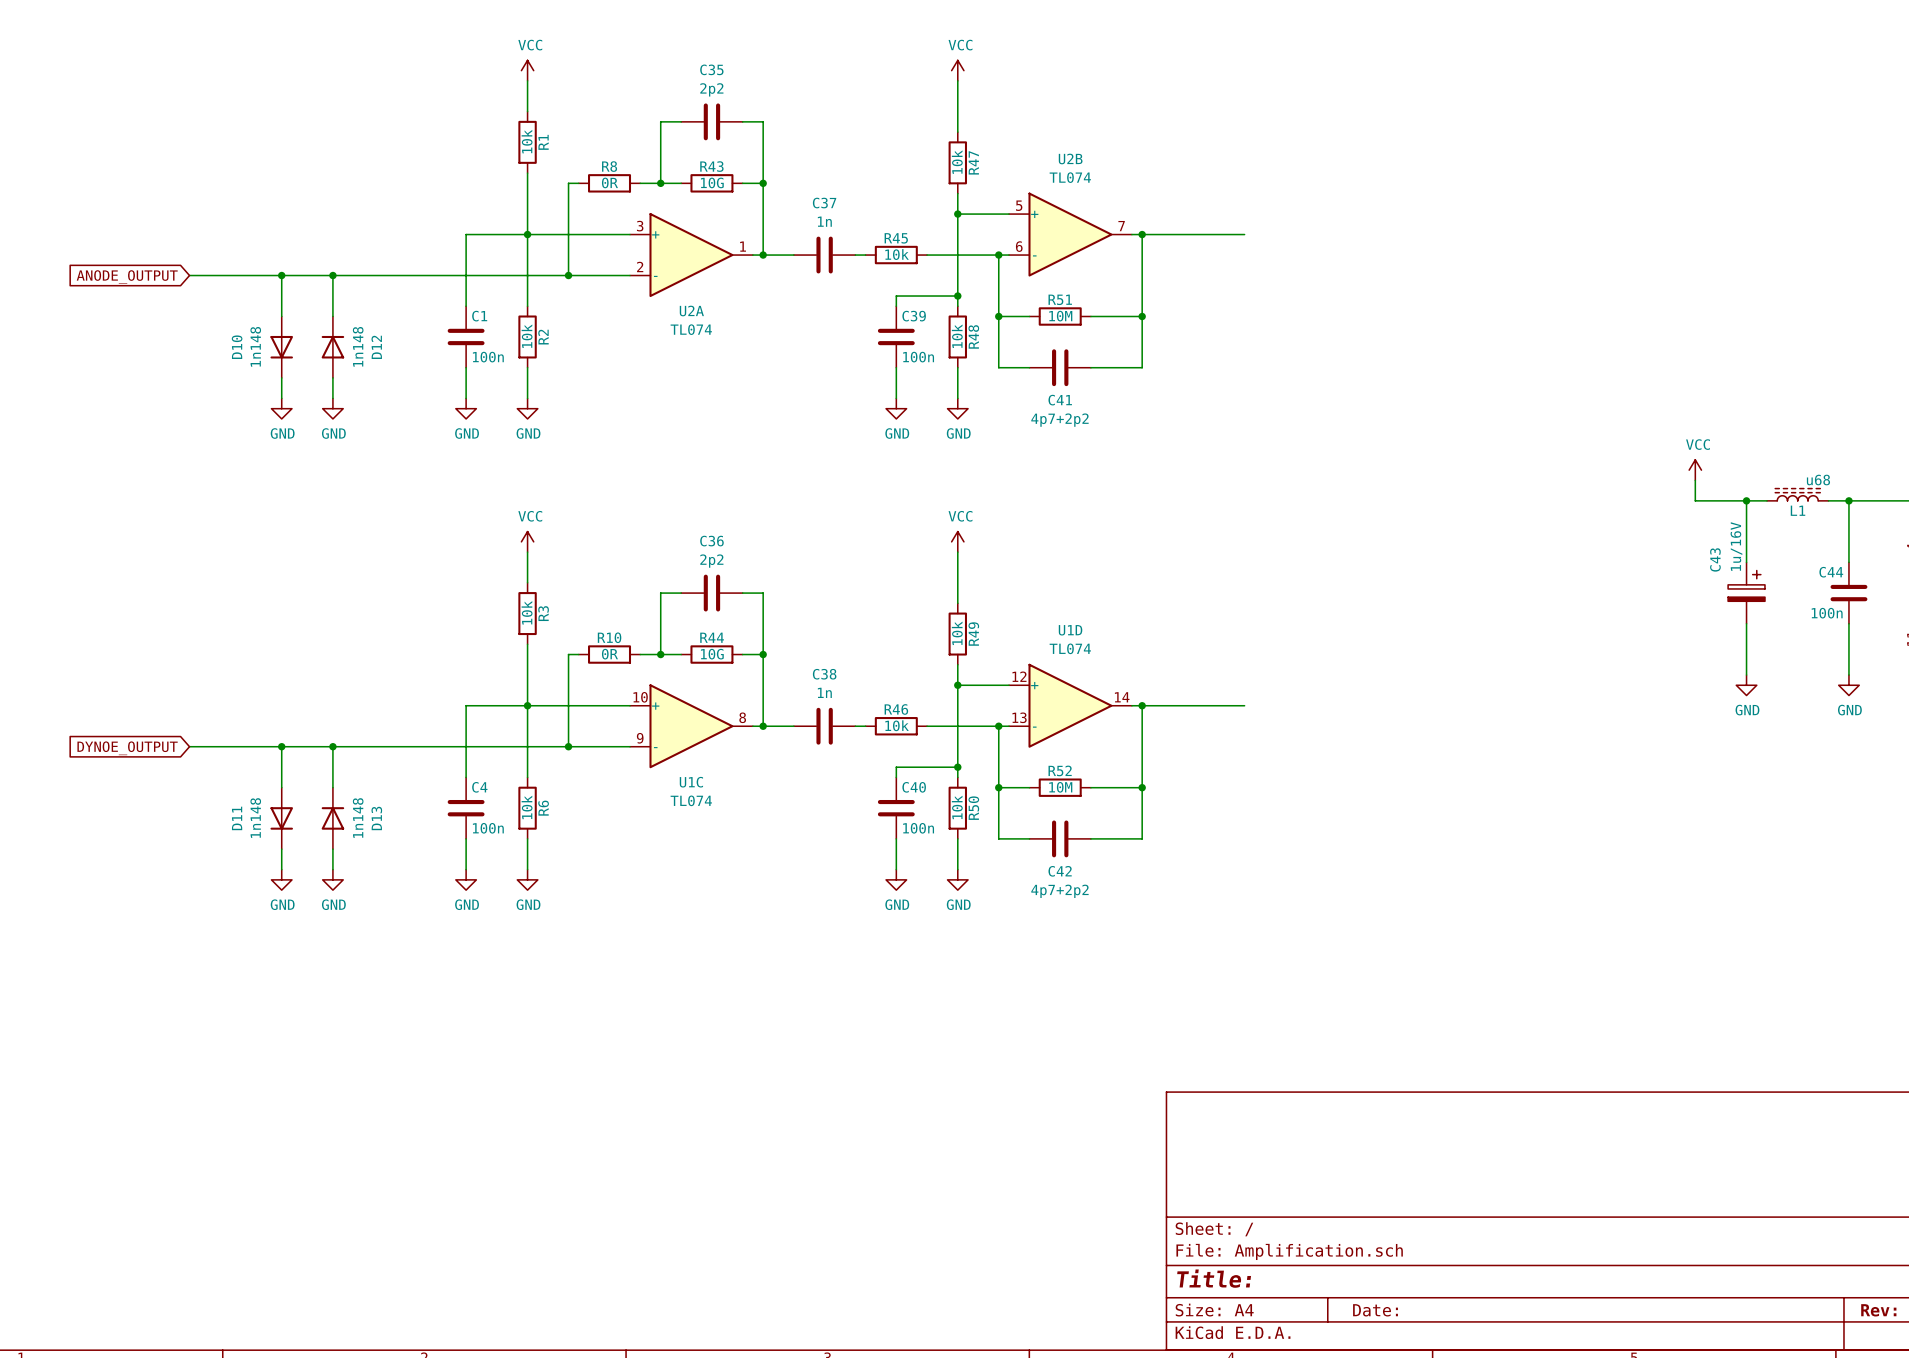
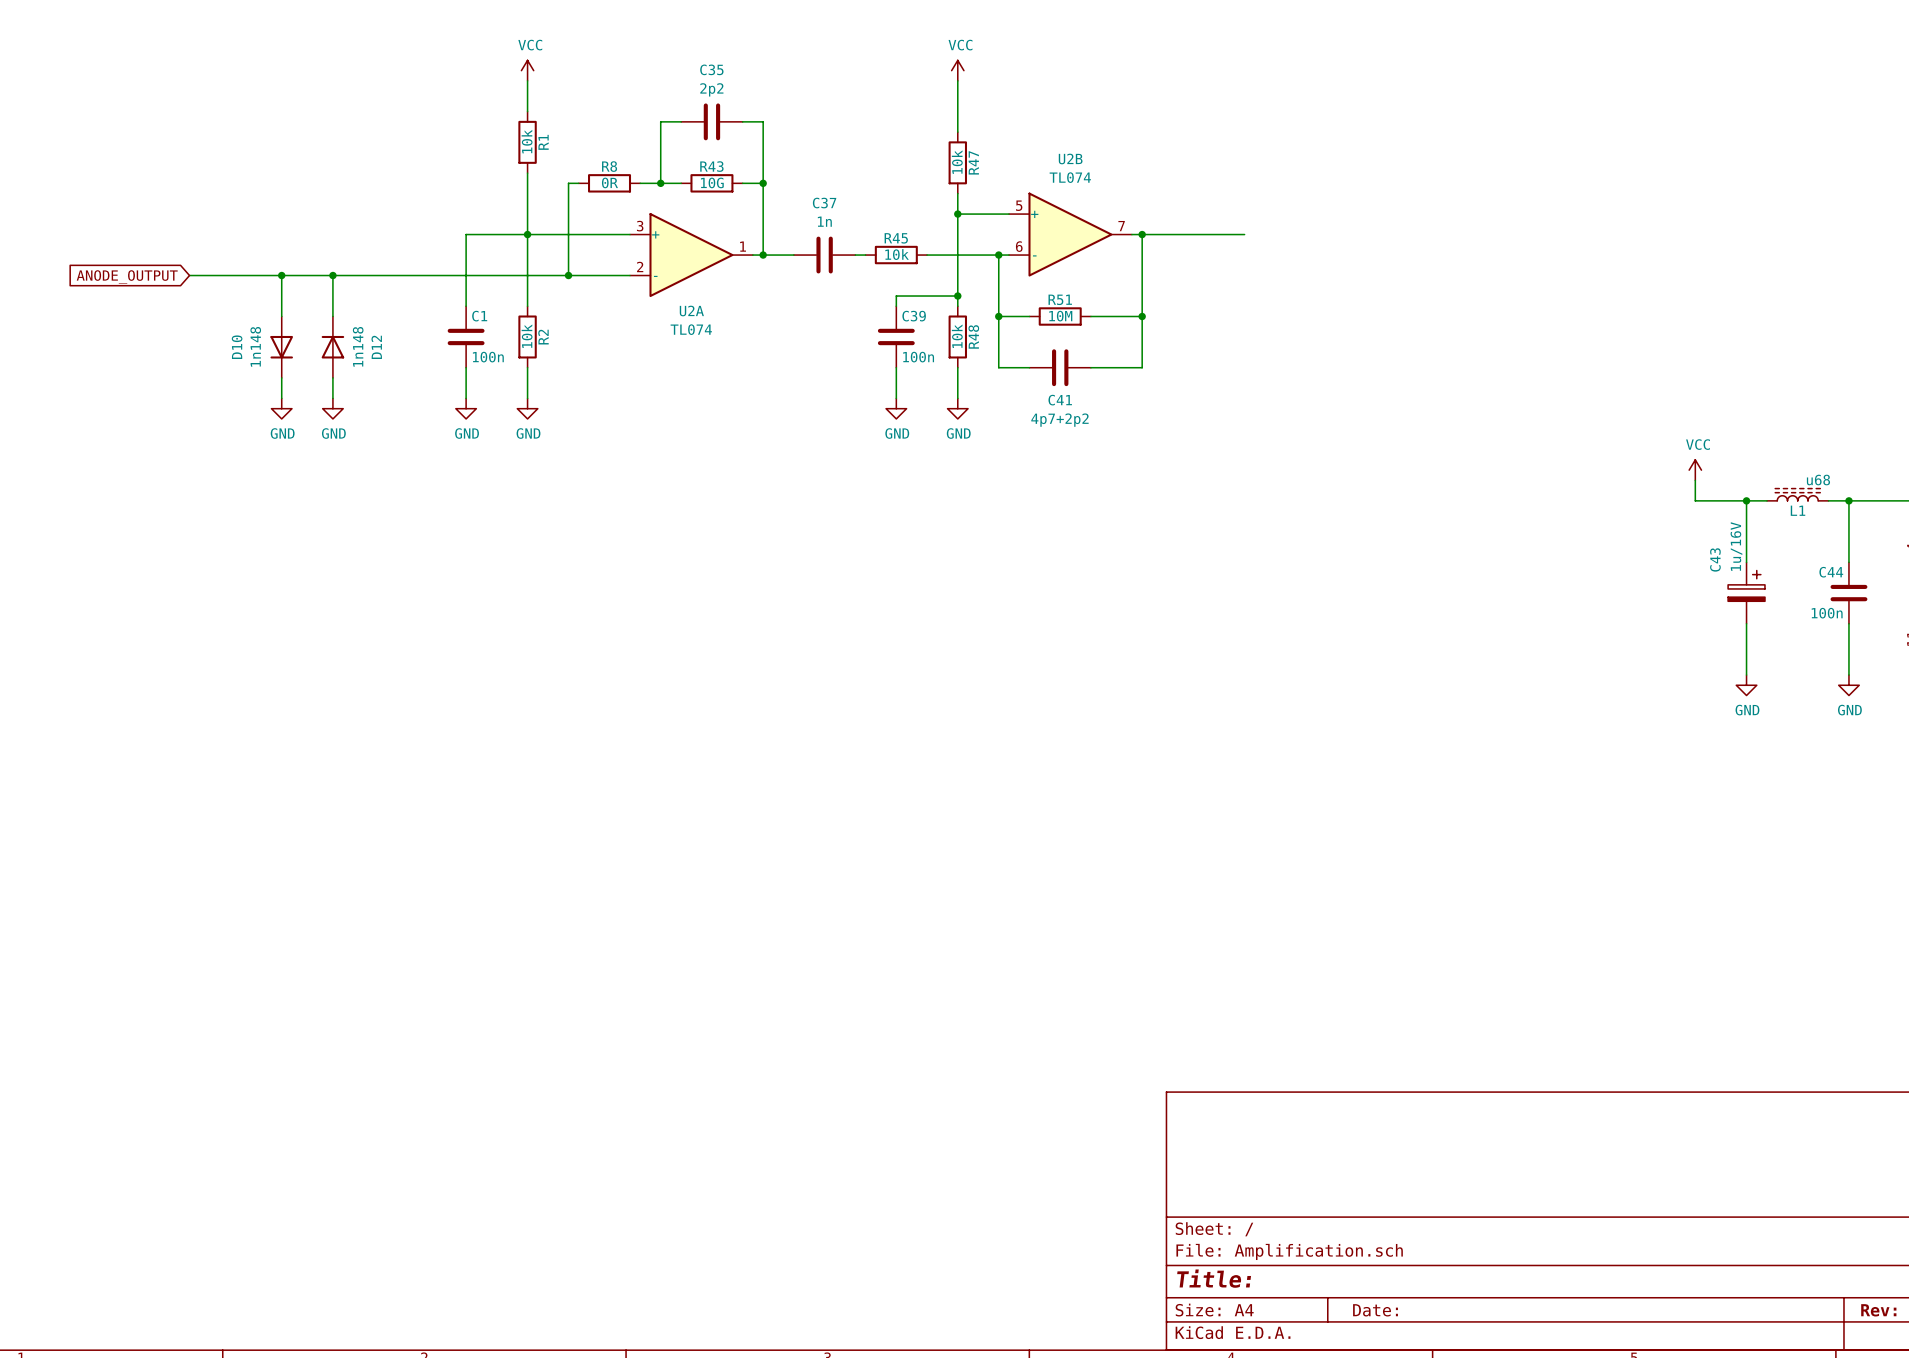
power symbol: VCC (527, 541) -> none
power symbol: VCC (957, 541) -> none
wire: (527, 552) (527, 582) -> none
wire: (957, 552) (957, 603) -> none
wire: (681, 593) (660, 593) (660, 654) -> none
C36: 2p2 (711, 593) -> none
wire: (742, 593) (763, 593) (763, 726) -> none
R3: 10k (527, 613) -> none
R49: 10k (957, 634) -> none
wire: (527, 644) (527, 777) -> none
wire: (578, 654) (568, 654) (568, 746) -> none
R10: 0R (609, 654) -> none
wire: (640, 654) (681, 654) -> none
junction: (660, 654) -> none
R44: 10G (711, 654) -> none
wire: (742, 654) (763, 654) -> none
junction: (763, 654) -> none
wire: (957, 664) (957, 777) -> none
wire: (957, 685) (1009, 685) -> none
junction: (957, 685) -> none
junction: (527, 705) -> none
wire: (630, 705) (466, 705) (466, 777) -> none
U1D: TL074 (1070, 705) -> none
wire: (1131, 705) (1244, 705) -> none
wire: (1142, 705) (1142, 838) (1090, 838) -> none
junction: (1142, 705) -> none
U1C: TL074 (691, 726) -> none
wire: (752, 726) (793, 726) -> none
junction: (763, 726) -> none
C38: 1n (824, 726) -> none
wire: (855, 726) (865, 726) -> none
R46: 10k (896, 726) -> none
wire: (927, 726) (1009, 726) -> none
wire: (998, 726) (998, 838) (1029, 838) -> none
junction: (998, 726) -> none
wire: (189, 746) (630, 746) -> none
wire: (281, 746) (281, 787) -> none
junction: (281, 746) -> none
wire: (332, 746) (332, 787) -> none
junction: (332, 746) -> none
junction: (568, 746) -> none
global label: DYNOE_OUTPUT (127, 748) -> none
wire: (957, 767) (896, 767) (896, 777) -> none
junction: (957, 767) -> none
wire: (998, 787) (1029, 787) -> none
junction: (998, 787) -> none
R52: 10M (1060, 787) -> none
wire: (1090, 787) (1142, 787) -> none
junction: (1142, 787) -> none
C4: 100n (466, 808) -> none
R6: 10k (527, 808) -> none
C40: 100n (896, 808) -> none
R50: 10k (957, 808) -> none
D11: 1n148 (281, 818) -> none
D13: 1n148 (332, 818) -> none
wire: (466, 838) (466, 869) -> none
wire: (527, 838) (527, 869) -> none
wire: (896, 838) (896, 869) -> none
wire: (957, 838) (957, 869) -> none
C42: 4p7+2p2 (1060, 838) -> none
wire: (281, 849) (281, 869) -> none
wire: (332, 849) (332, 869) -> none
power symbol: GND (281, 879) -> none
power symbol: GND (332, 879) -> none
power symbol: GND (466, 879) -> none
power symbol: GND (527, 879) -> none
power symbol: GND (896, 879) -> none
power symbol: GND (957, 879) -> none

